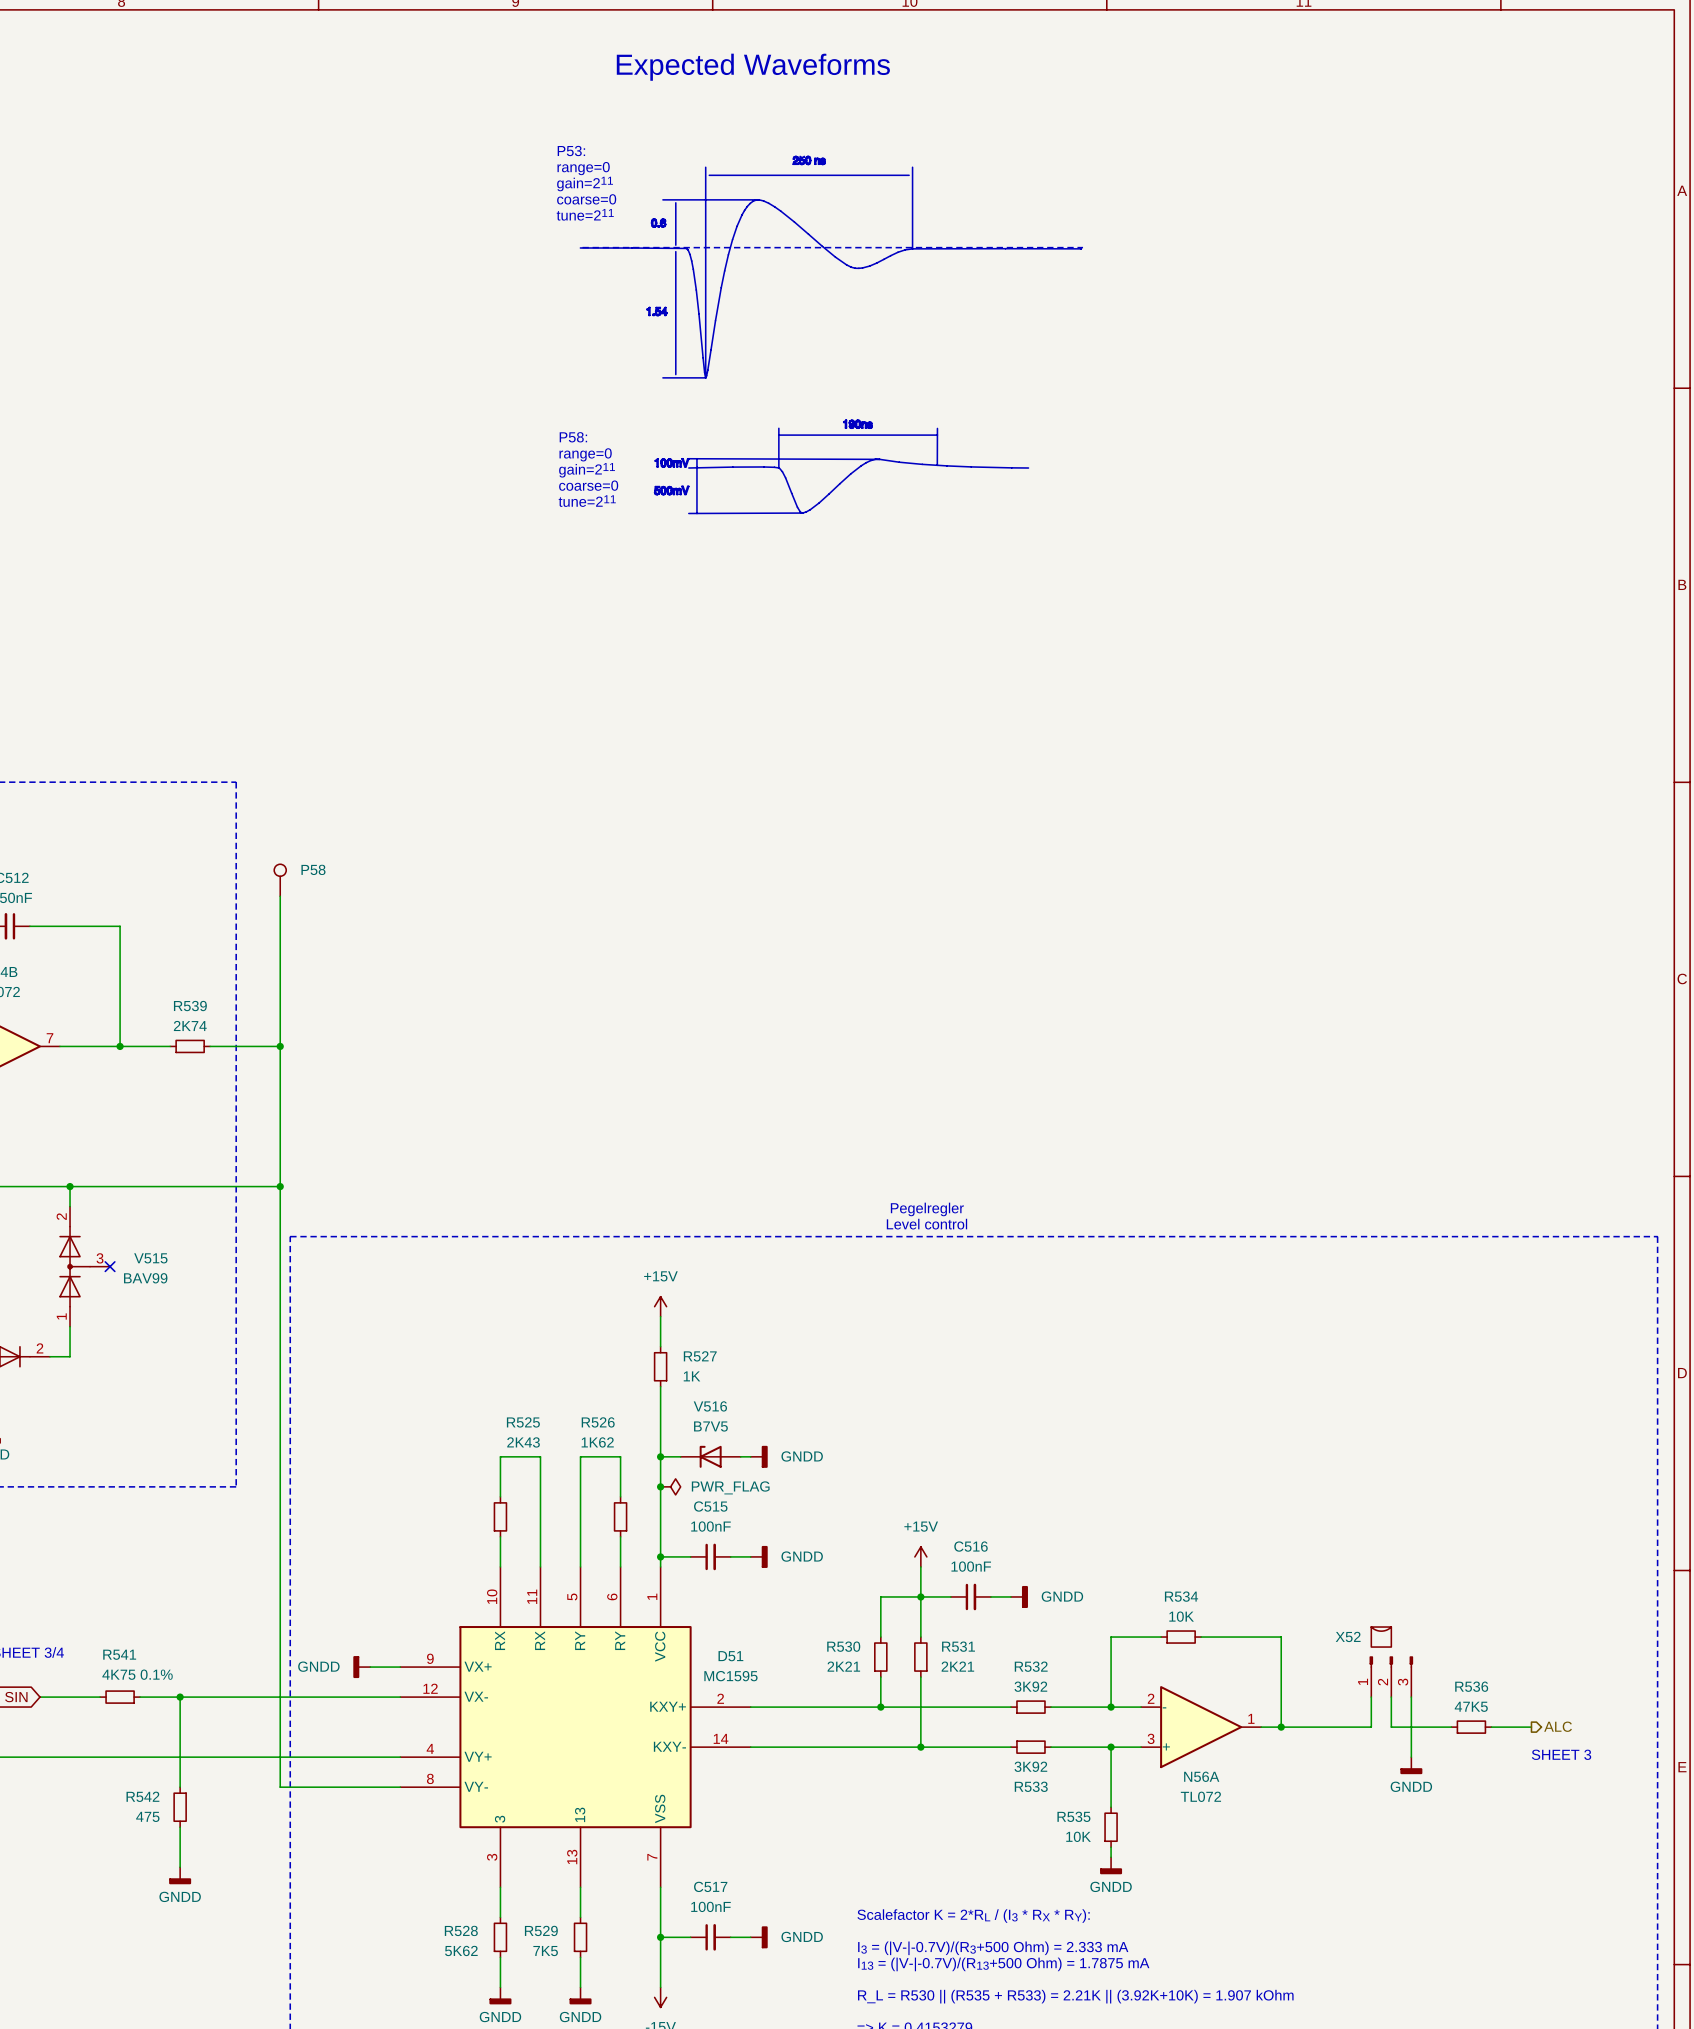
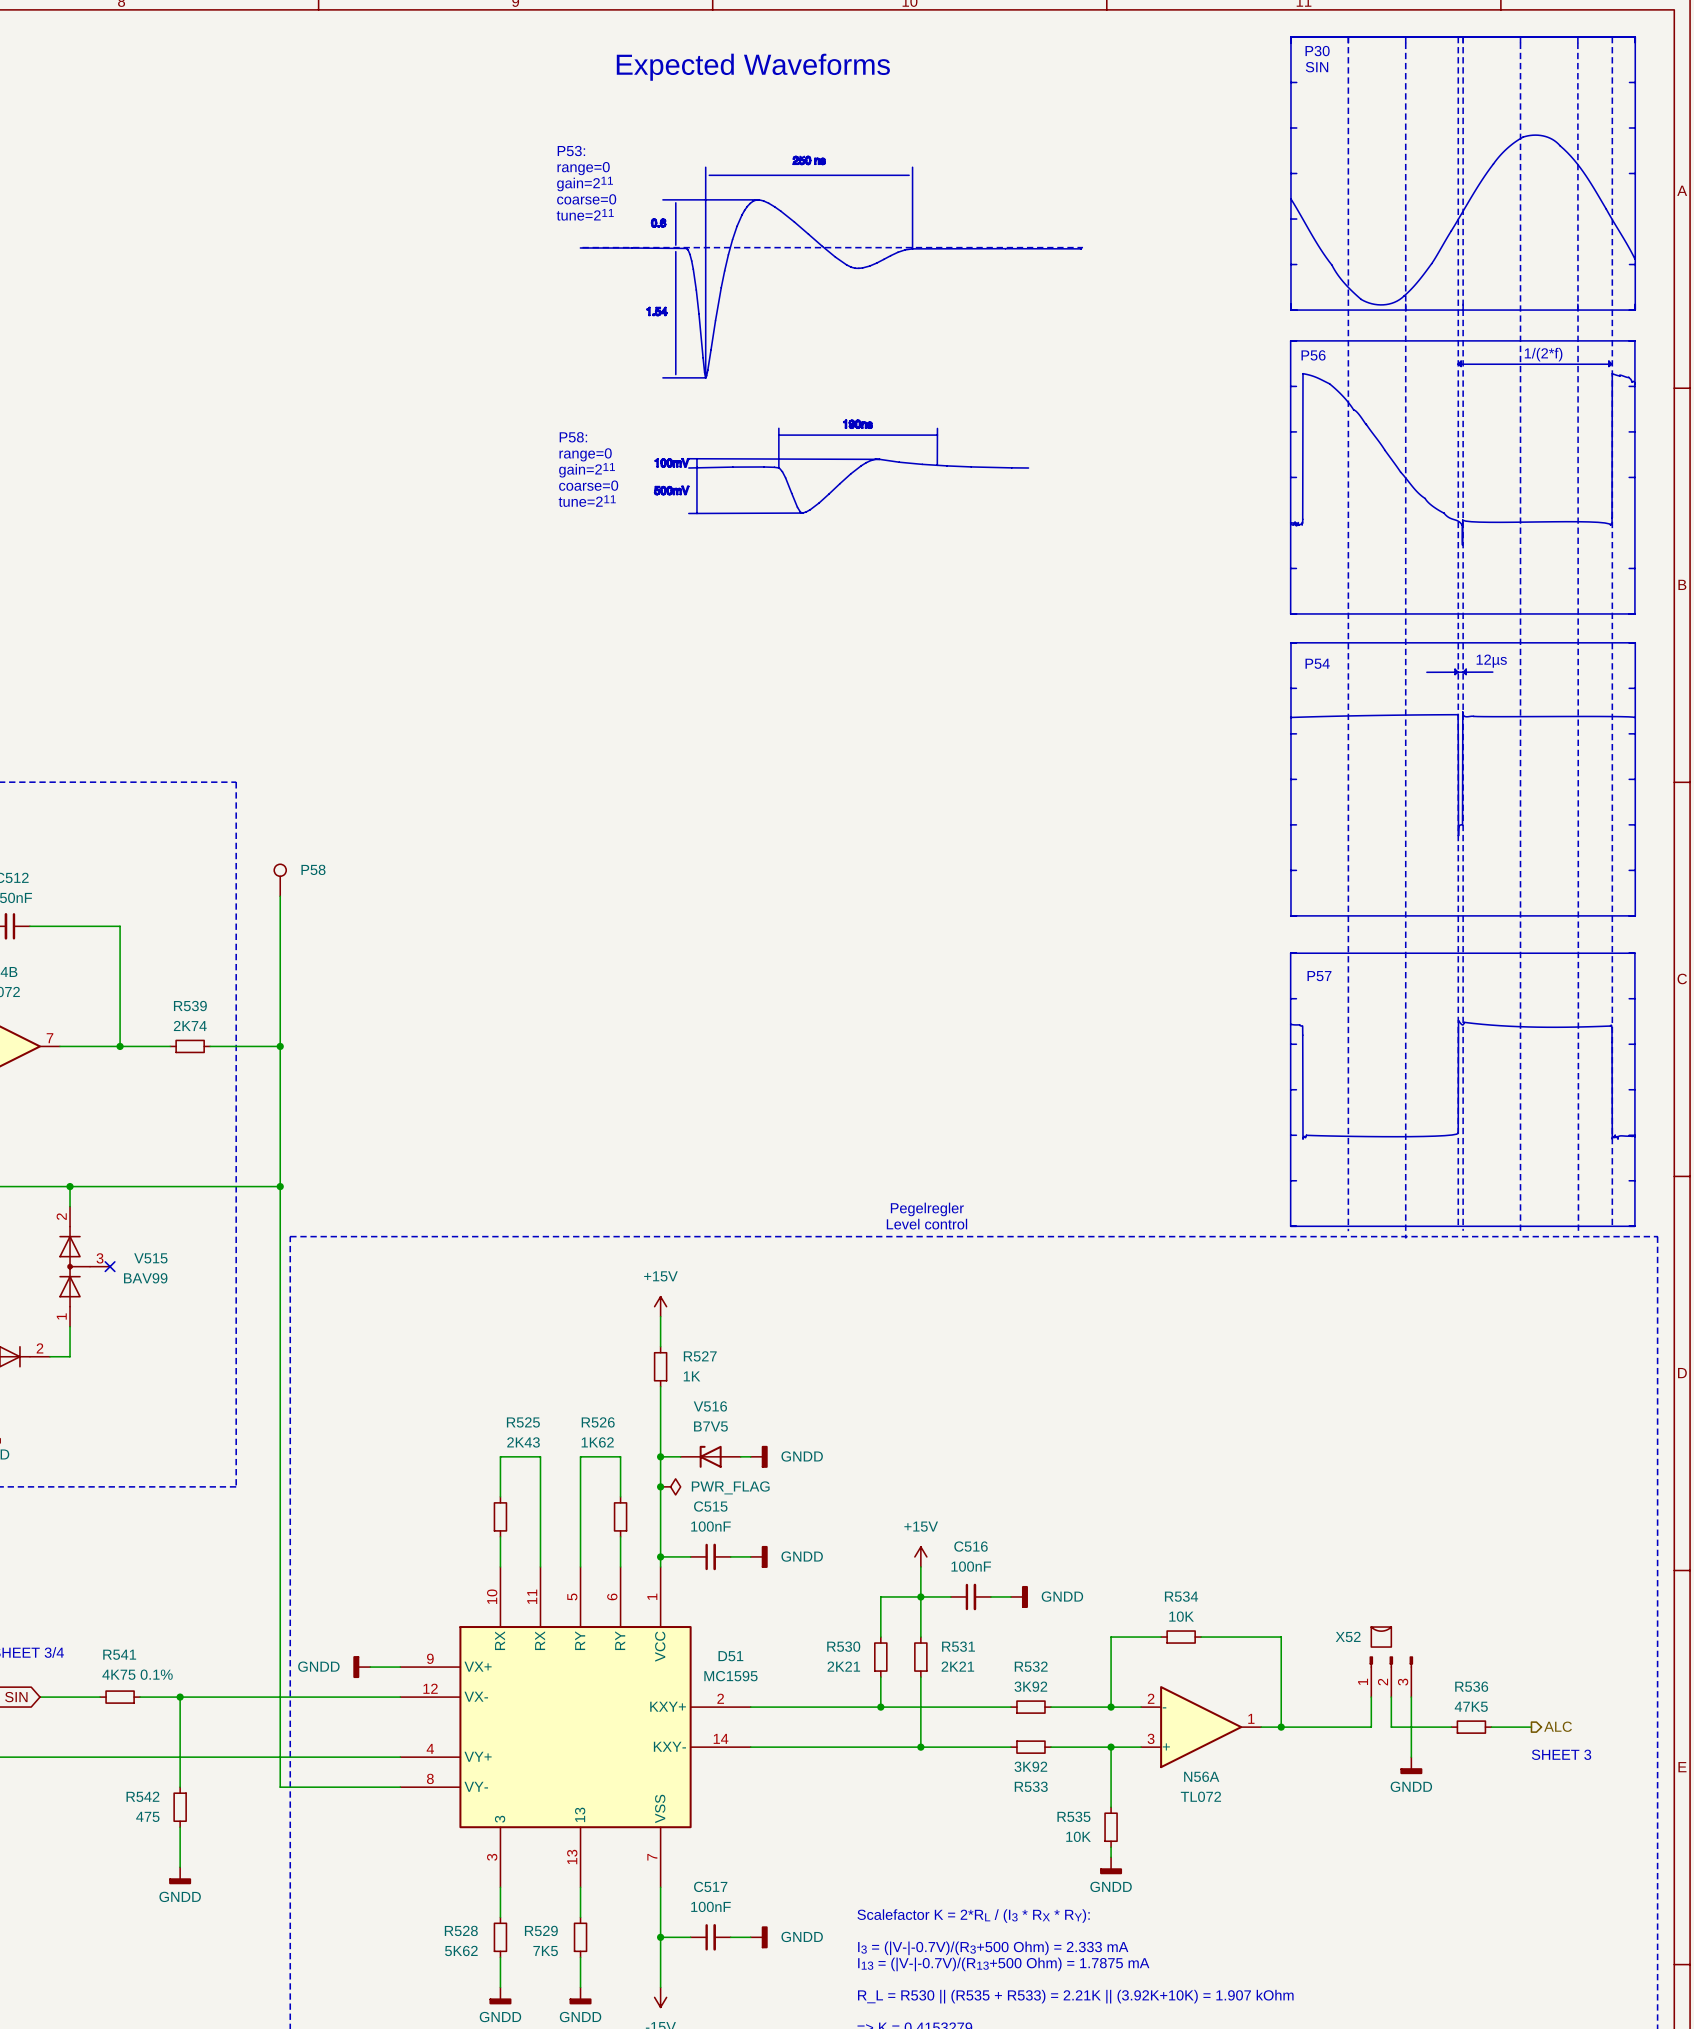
line: none -> (1290, 36) (1635, 36) (1635, 310) (1290, 310) (1290, 36)
line: none -> (1405, 36) (1405, 1238)
line: none -> (1458, 36) (1458, 1226)
line: none -> (1520, 36) (1520, 1234)
line: none -> (1577, 36) (1578, 1233)
line: none -> (1612, 36) (1612, 1226)
line: none -> (1348, 42) (1348, 36) (1348, 1231)
line: none -> (1463, 42) (1463, 36) (1463, 1230)
text: none -> P30 (1317, 51)
text: none -> SIN (1316, 67)
line: none -> (1290, 82) (1296, 82)
line: none -> (1629, 82) (1635, 82)
line: none -> (1290, 127) (1296, 127)
line: none -> (1629, 127) (1635, 127)
line: none -> (1290, 173) (1296, 173)
line: none -> (1629, 173) (1635, 173)
line: none -> (1290, 198) (1320, 249) (1346, 285) (1366, 301) (1377, 304) (1389, 304) (1402, 297) (1425, 272) (1479, 184) (1501, 154) (1523, 137) (1543, 135) (1556, 142) (1580, 167) (1634, 259)
line: none -> (1290, 219) (1296, 219)
line: none -> (1290, 264) (1296, 264)
line: none -> (1629, 264) (1635, 264)
line: none -> (1405, 304) (1405, 310)
line: none -> (1463, 304) (1463, 310)
line: none -> (1577, 304) (1577, 310)
line: none -> (1290, 340) (1634, 340) (1634, 613) (1290, 613) (1290, 340)
text: none -> 1/(2*f) (1543, 354)
text: none -> P56 (1313, 355)
line: none -> (1458, 364) (1461, 366) (1461, 361) (1458, 364)
line: none -> (1458, 364) (1611, 364)
line: none -> (1611, 364) (1608, 366) (1608, 361) (1611, 364)
line: none -> (1634, 384) (1628, 377) (1612, 373) (1610, 525) (1588, 521) (1489, 522) (1462, 520) (1462, 545) (1461, 524) (1433, 506) (1416, 491) (1343, 396) (1329, 383) (1303, 373) (1302, 522) (1298, 525) (1298, 522) (1296, 525) (1295, 524) (1295, 523) (1295, 522) (1295, 521) (1295, 521) (1294, 522) (1294, 523) (1294, 524) (1293, 525) (1290, 522) (1296, 522)
line: none -> (1290, 386) (1296, 386)
line: none -> (1629, 386) (1634, 386)
line: none -> (1290, 431) (1296, 431)
line: none -> (1629, 431) (1634, 431)
line: none -> (1290, 477) (1296, 477)
line: none -> (1629, 477) (1634, 477)
line: none -> (1290, 568) (1296, 568)
line: none -> (1629, 568) (1634, 568)
line: none -> (1290, 642) (1635, 642) (1635, 915) (1290, 915)
line: none -> (1290, 642) (1290, 915)
text: none -> 12µs (1491, 661)
text: none -> P54 (1317, 663)
line: none -> (1455, 669) (1455, 674) (1458, 672) (1455, 669)
line: none -> (1466, 669) (1463, 672) (1466, 674) (1466, 669)
line: none -> (1492, 672) (1426, 672)
line: none -> (1290, 688) (1296, 688)
line: none -> (1629, 688) (1634, 688)
line: none -> (1290, 717) (1458, 714) (1458, 835) (1459, 826) (1462, 824) (1462, 712) (1466, 716) (1634, 717)
line: none -> (1290, 733) (1296, 733)
line: none -> (1629, 733) (1634, 733)
line: none -> (1290, 779) (1296, 779)
line: none -> (1629, 779) (1634, 779)
line: none -> (1290, 824) (1296, 824)
line: none -> (1629, 824) (1634, 824)
line: none -> (1290, 870) (1296, 870)
line: none -> (1629, 870) (1634, 870)
line: none -> (1290, 953) (1634, 953) (1634, 1226) (1290, 1226) (1290, 953)
text: none -> P57 (1319, 976)
line: none -> (1290, 998) (1296, 998)
line: none -> (1629, 998) (1634, 998)
line: none -> (1290, 1024) (1302, 1026) (1303, 1138) (1306, 1135) (1410, 1136) (1444, 1135) (1458, 1133) (1458, 1020) (1462, 1024) (1464, 1022) (1537, 1027) (1611, 1025) (1612, 1138) (1615, 1135) (1618, 1138) (1620, 1135) (1634, 1137)
line: none -> (1290, 1044) (1296, 1044)
line: none -> (1629, 1044) (1634, 1044)
line: none -> (1290, 1089) (1296, 1089)
line: none -> (1629, 1089) (1634, 1089)
line: none -> (1290, 1135) (1296, 1135)
line: none -> (1629, 1135) (1634, 1135)
line: none -> (1290, 1180) (1296, 1180)
line: none -> (1629, 1180) (1634, 1180)

